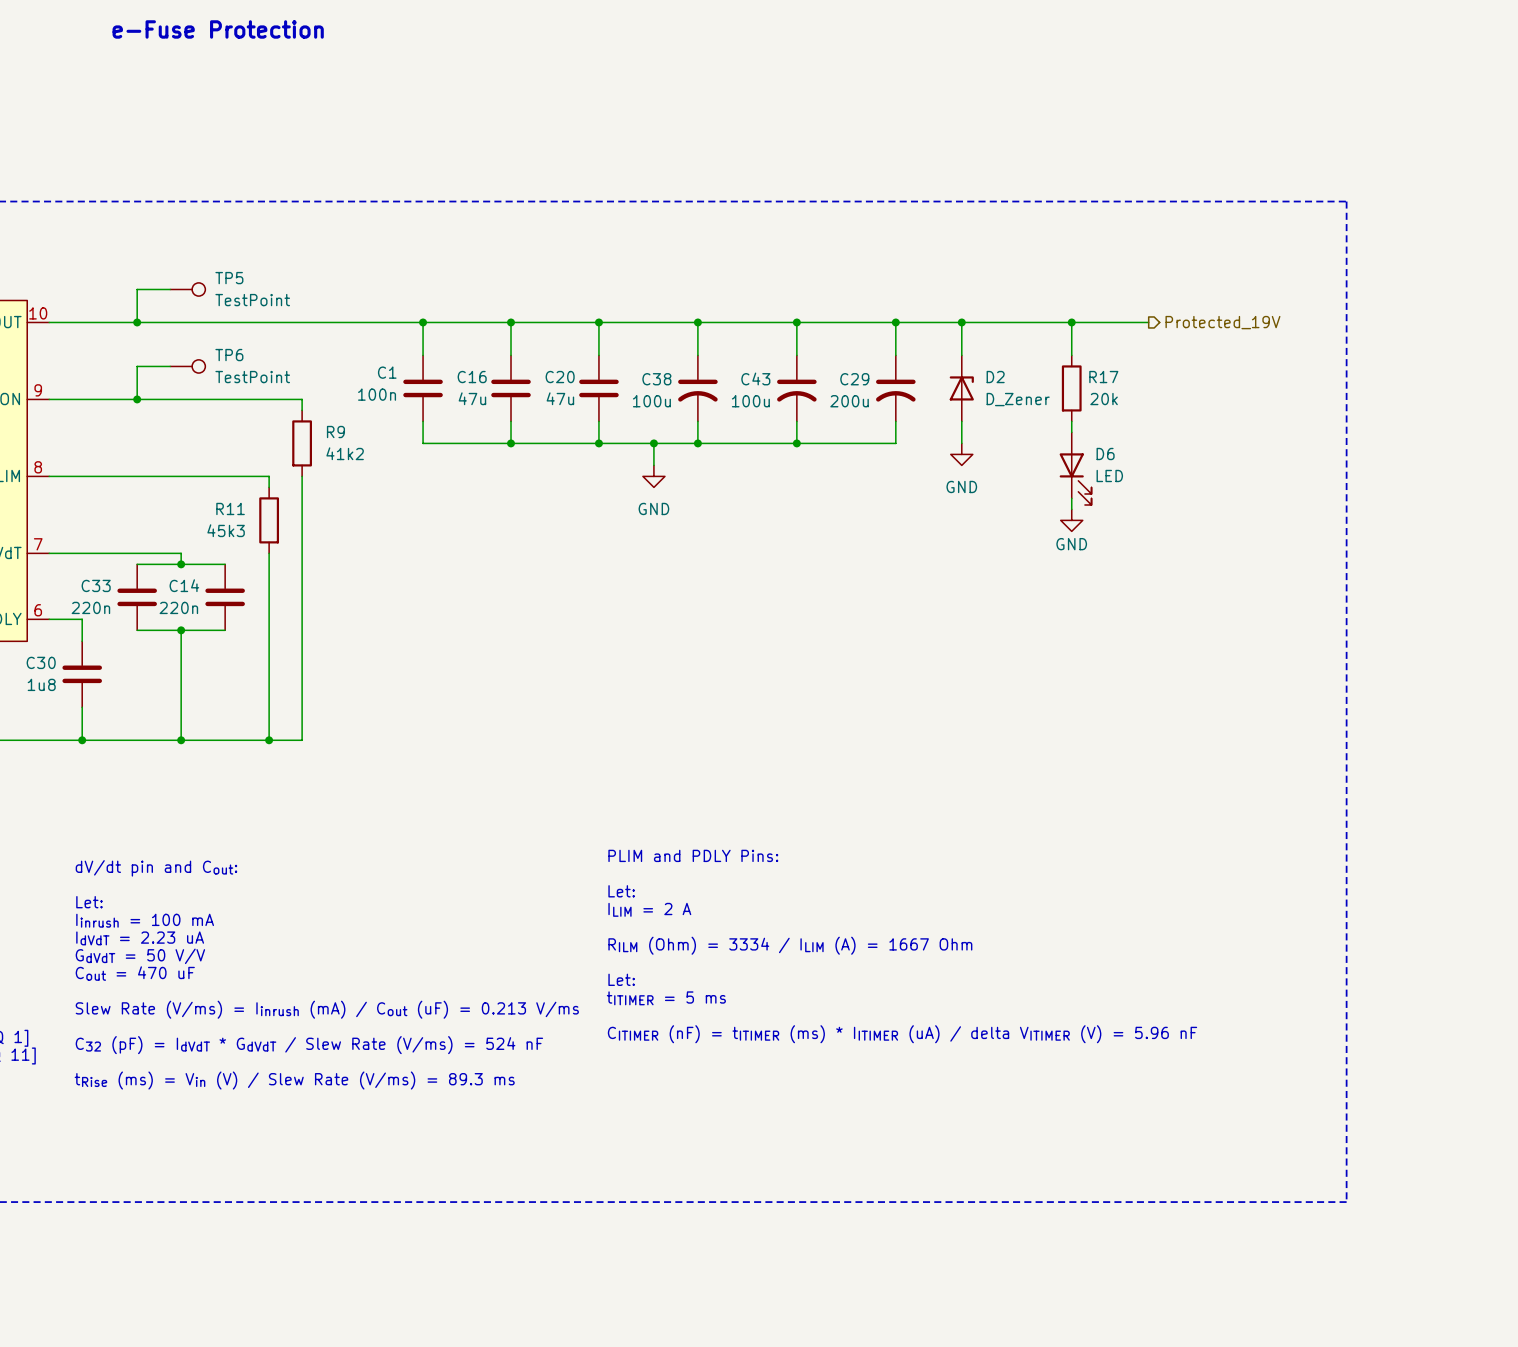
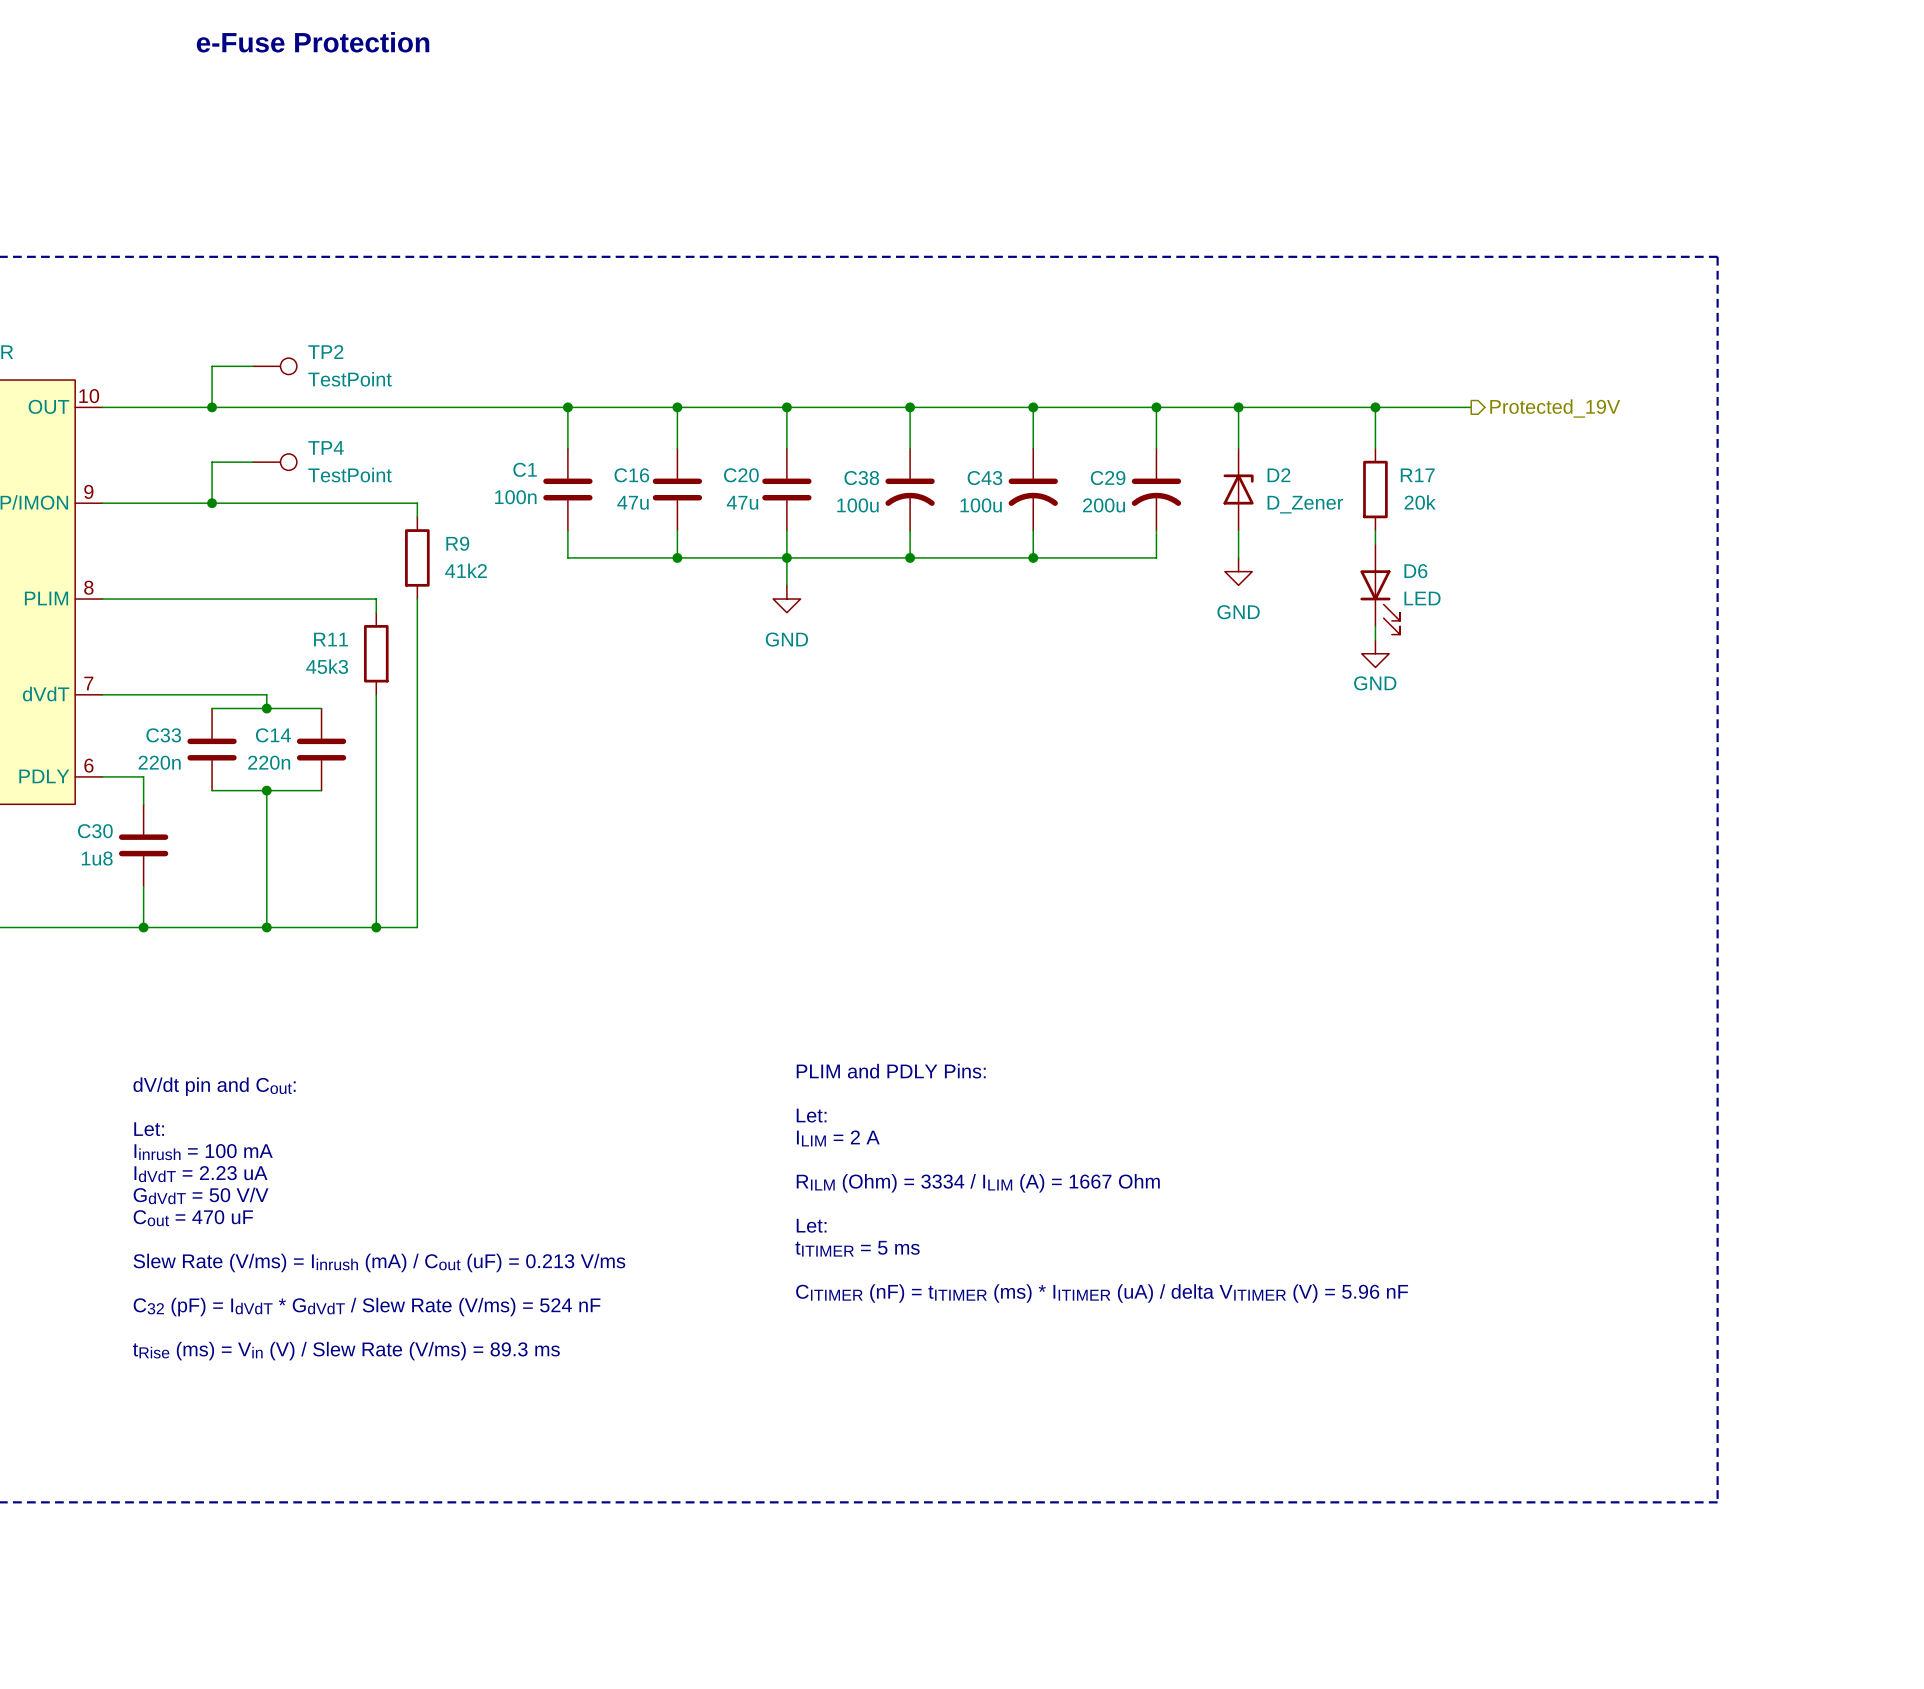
TP5 name: TP5 (229, 278) -> TP2 (325, 352)
TP6 name: TP6 (229, 355) -> TP4 (326, 447)
wire: (653, 443) (653, 465) -> (786, 557) (786, 585)
junction: (653, 443) -> none
power symbol position: GND (653, 476) -> GND (786, 599)

